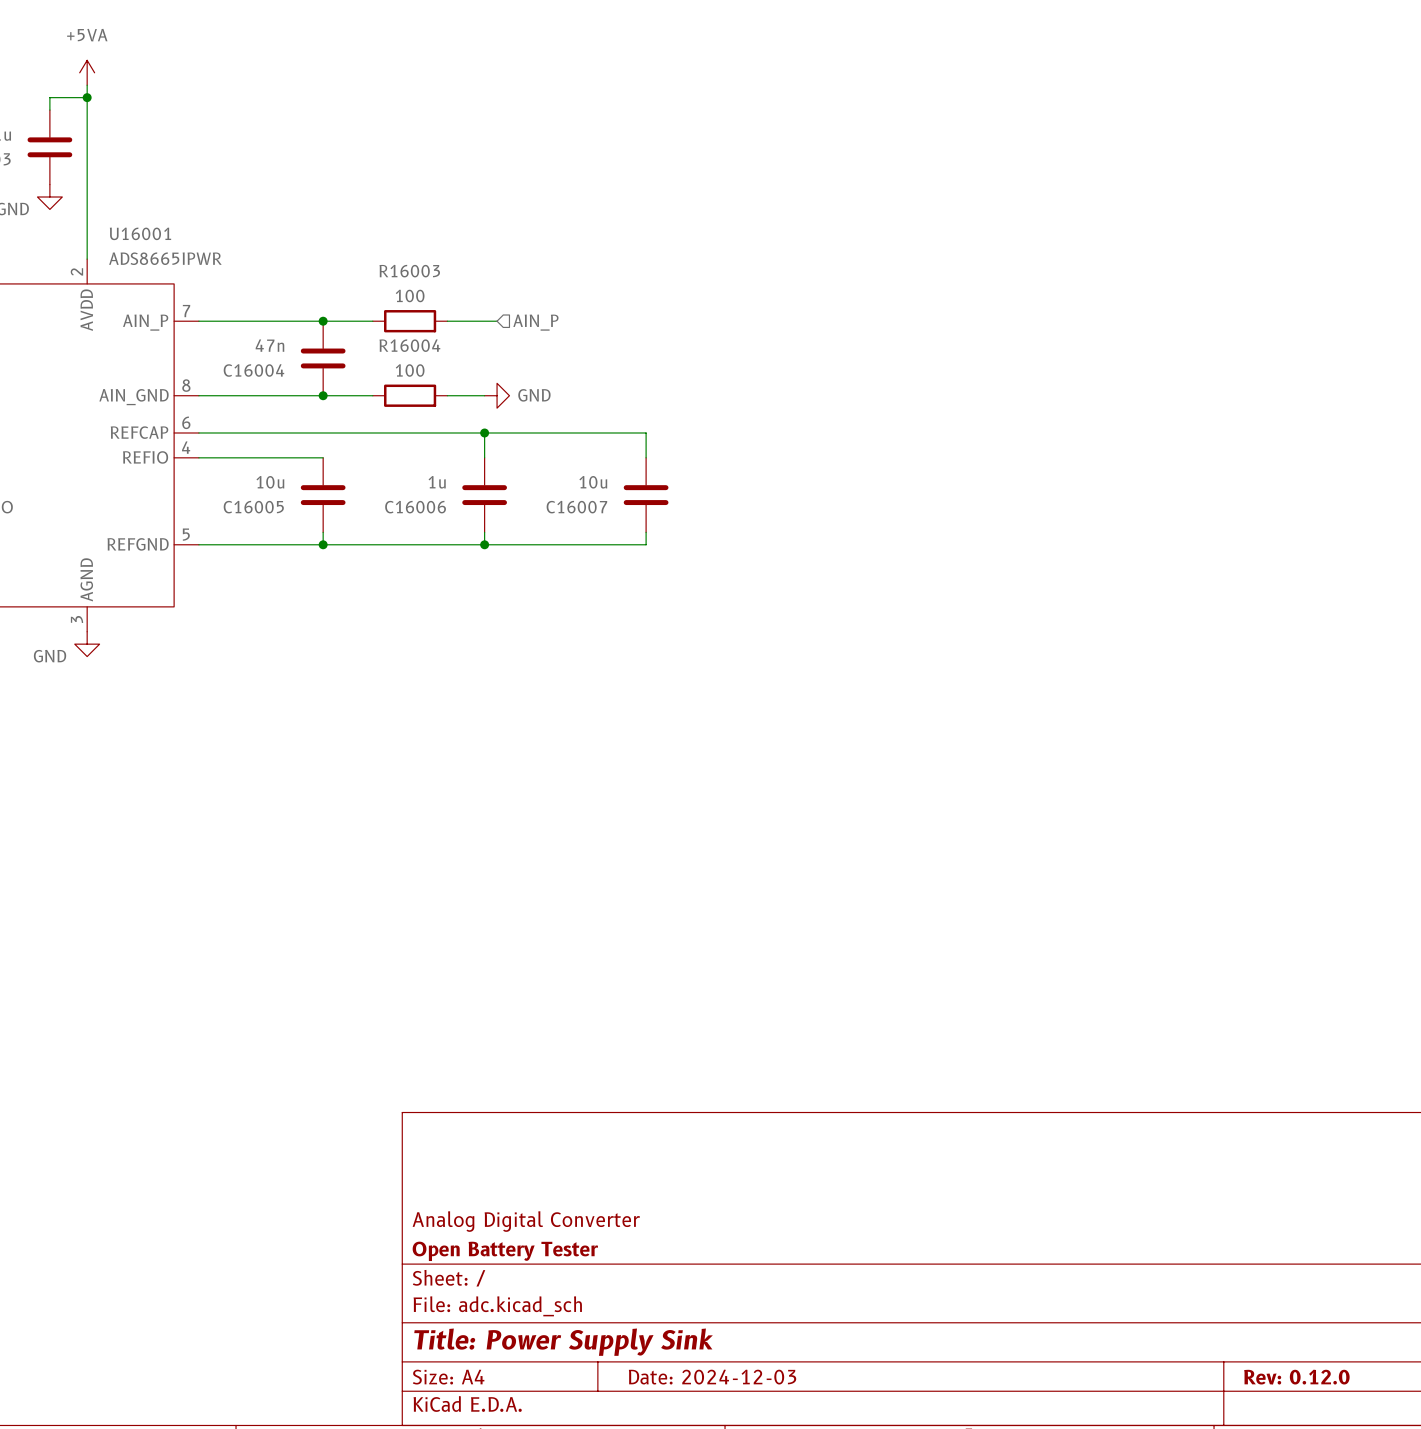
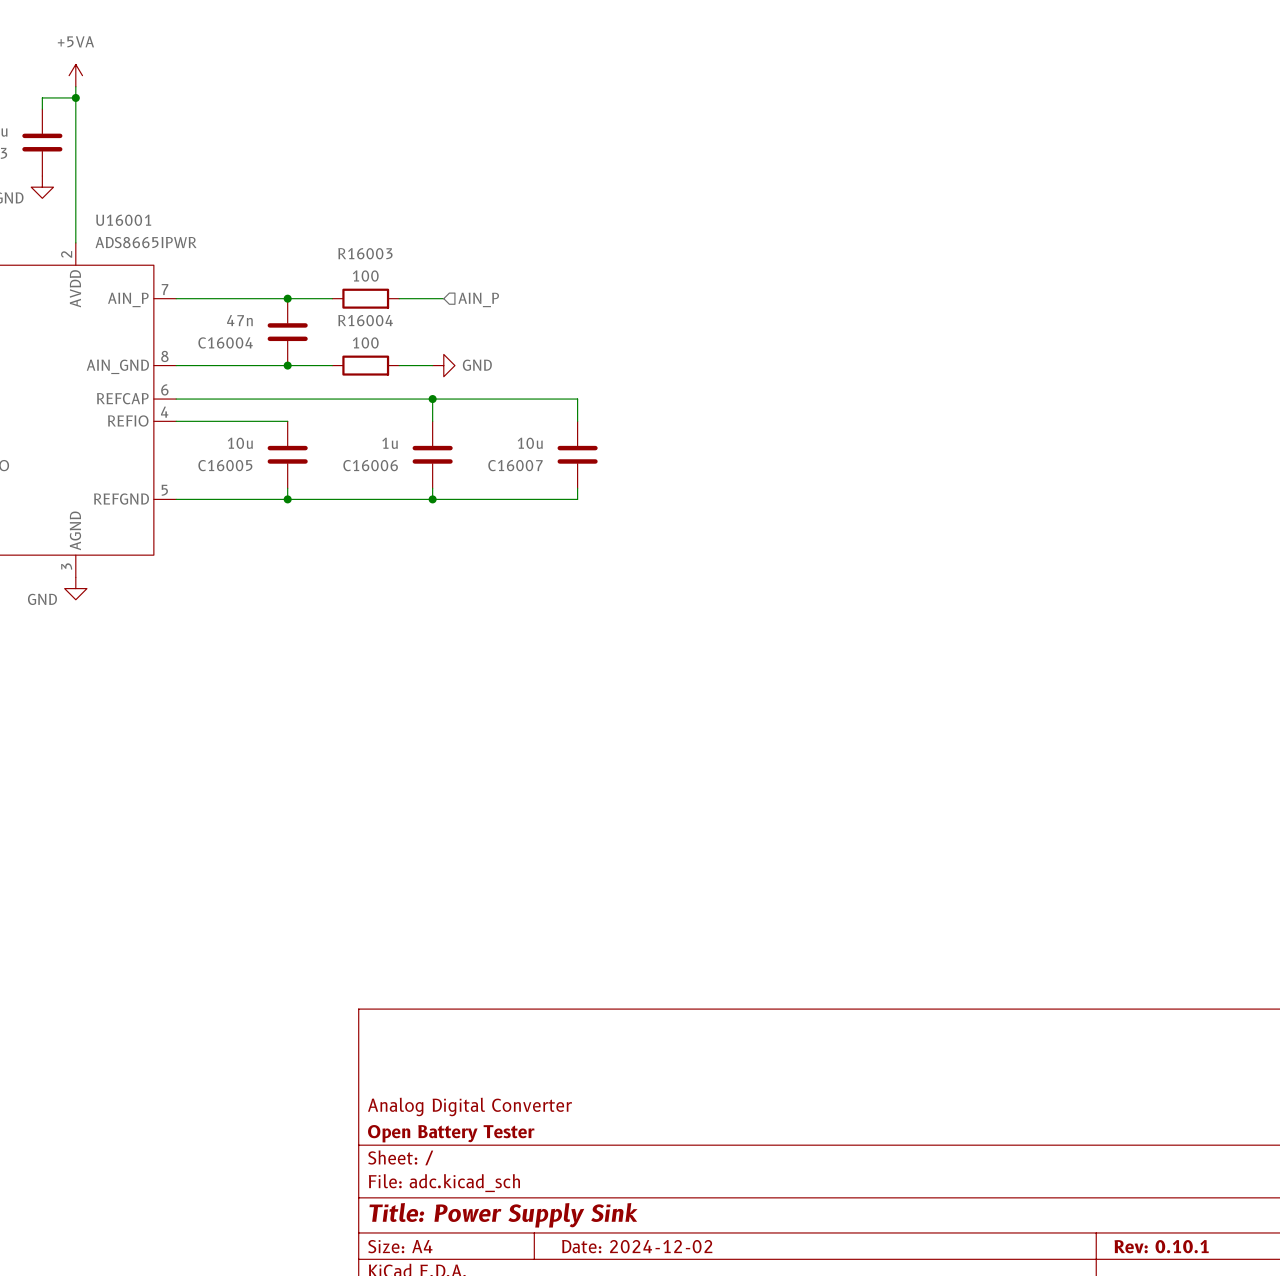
title block: Date: 2024-12-03 (712, 1377) -> Date: 2024-12-02 (637, 1246)
title block: Rev: 0.12.0 (1296, 1377) -> Rev: 0.10.1 (1161, 1246)

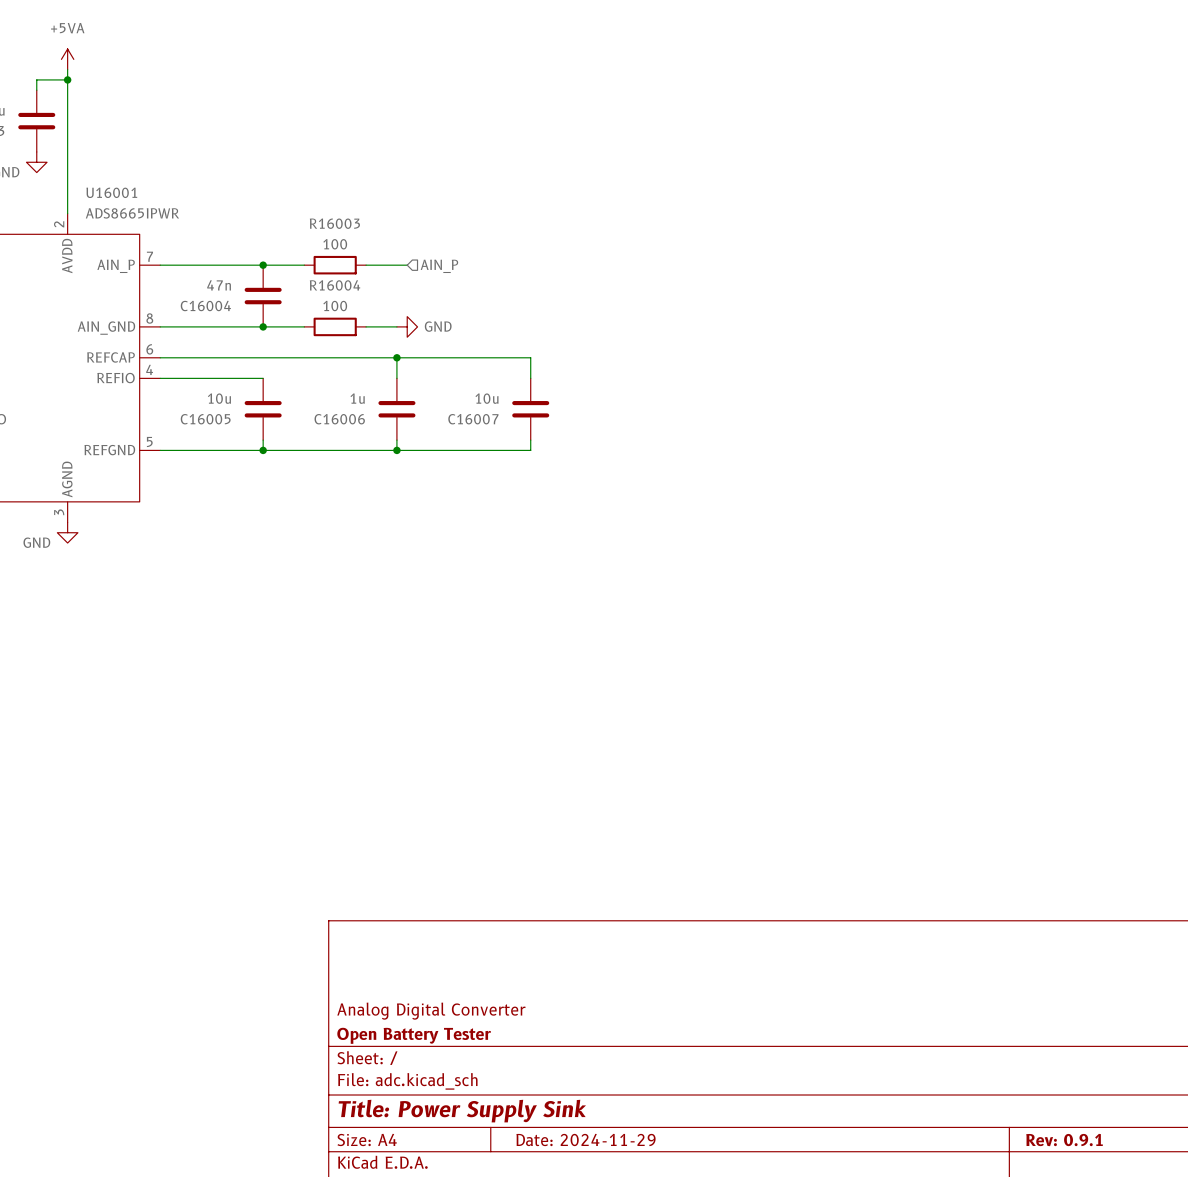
title block: Date: 2024-12-02 (637, 1246) -> Date: 2024-11-29 (586, 1139)
title block: Rev: 0.10.1 (1161, 1246) -> Rev: 0.9.1 (1064, 1140)

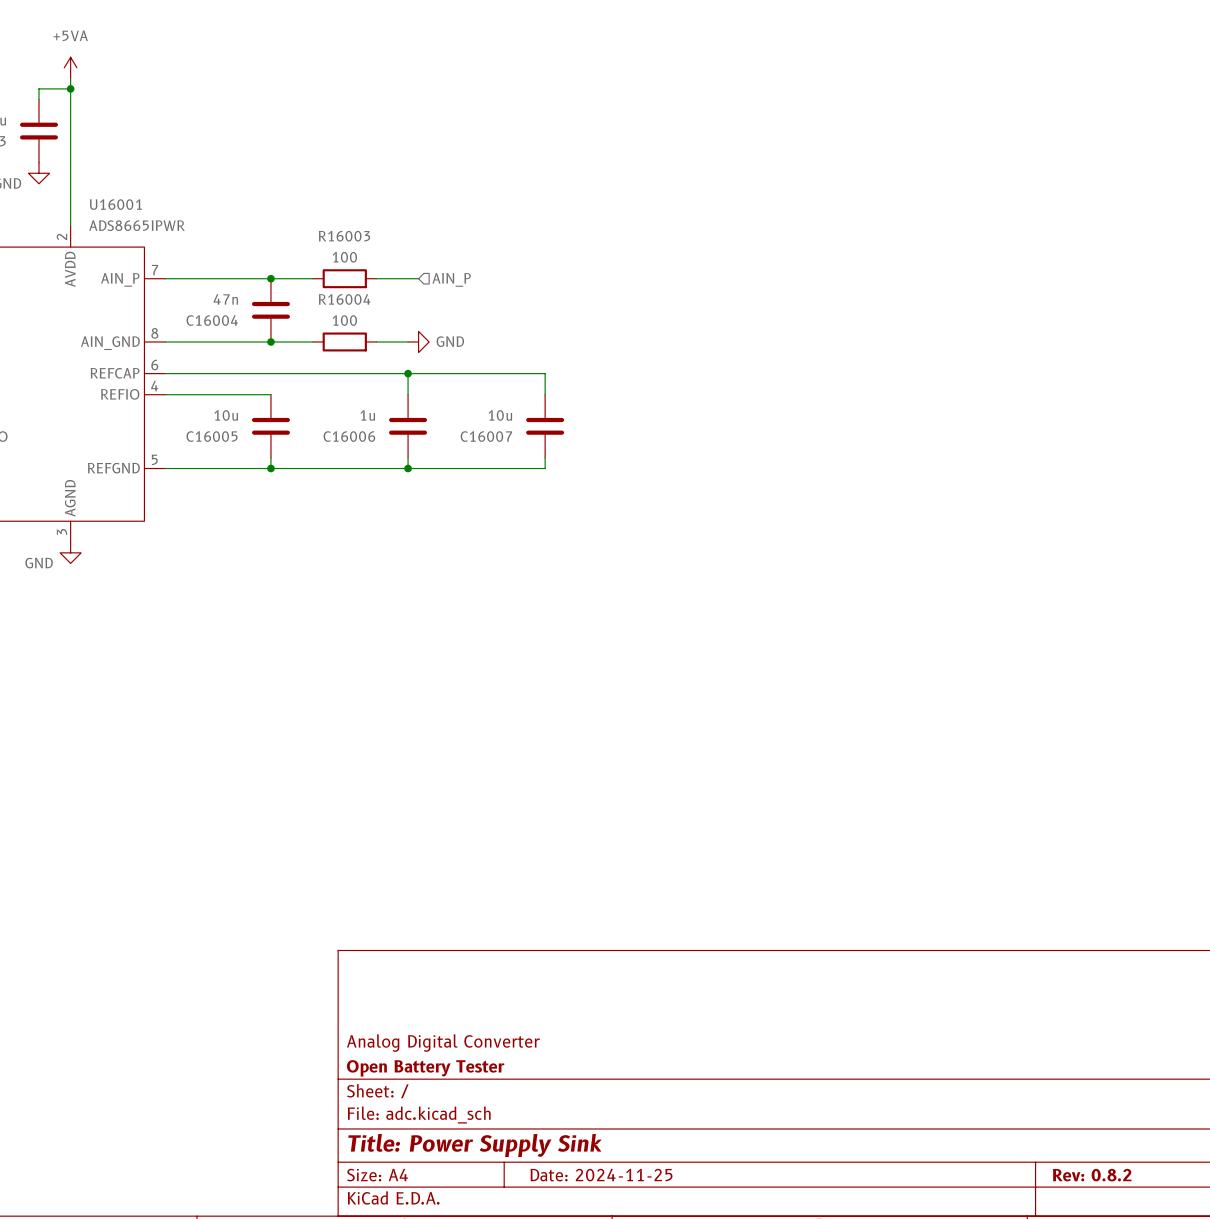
title block: Date: 2024-11-29 (586, 1139) -> Date: 2024-11-25 (601, 1175)
title block: Rev: 0.9.1 (1064, 1140) -> Rev: 0.8.2 (1092, 1175)

